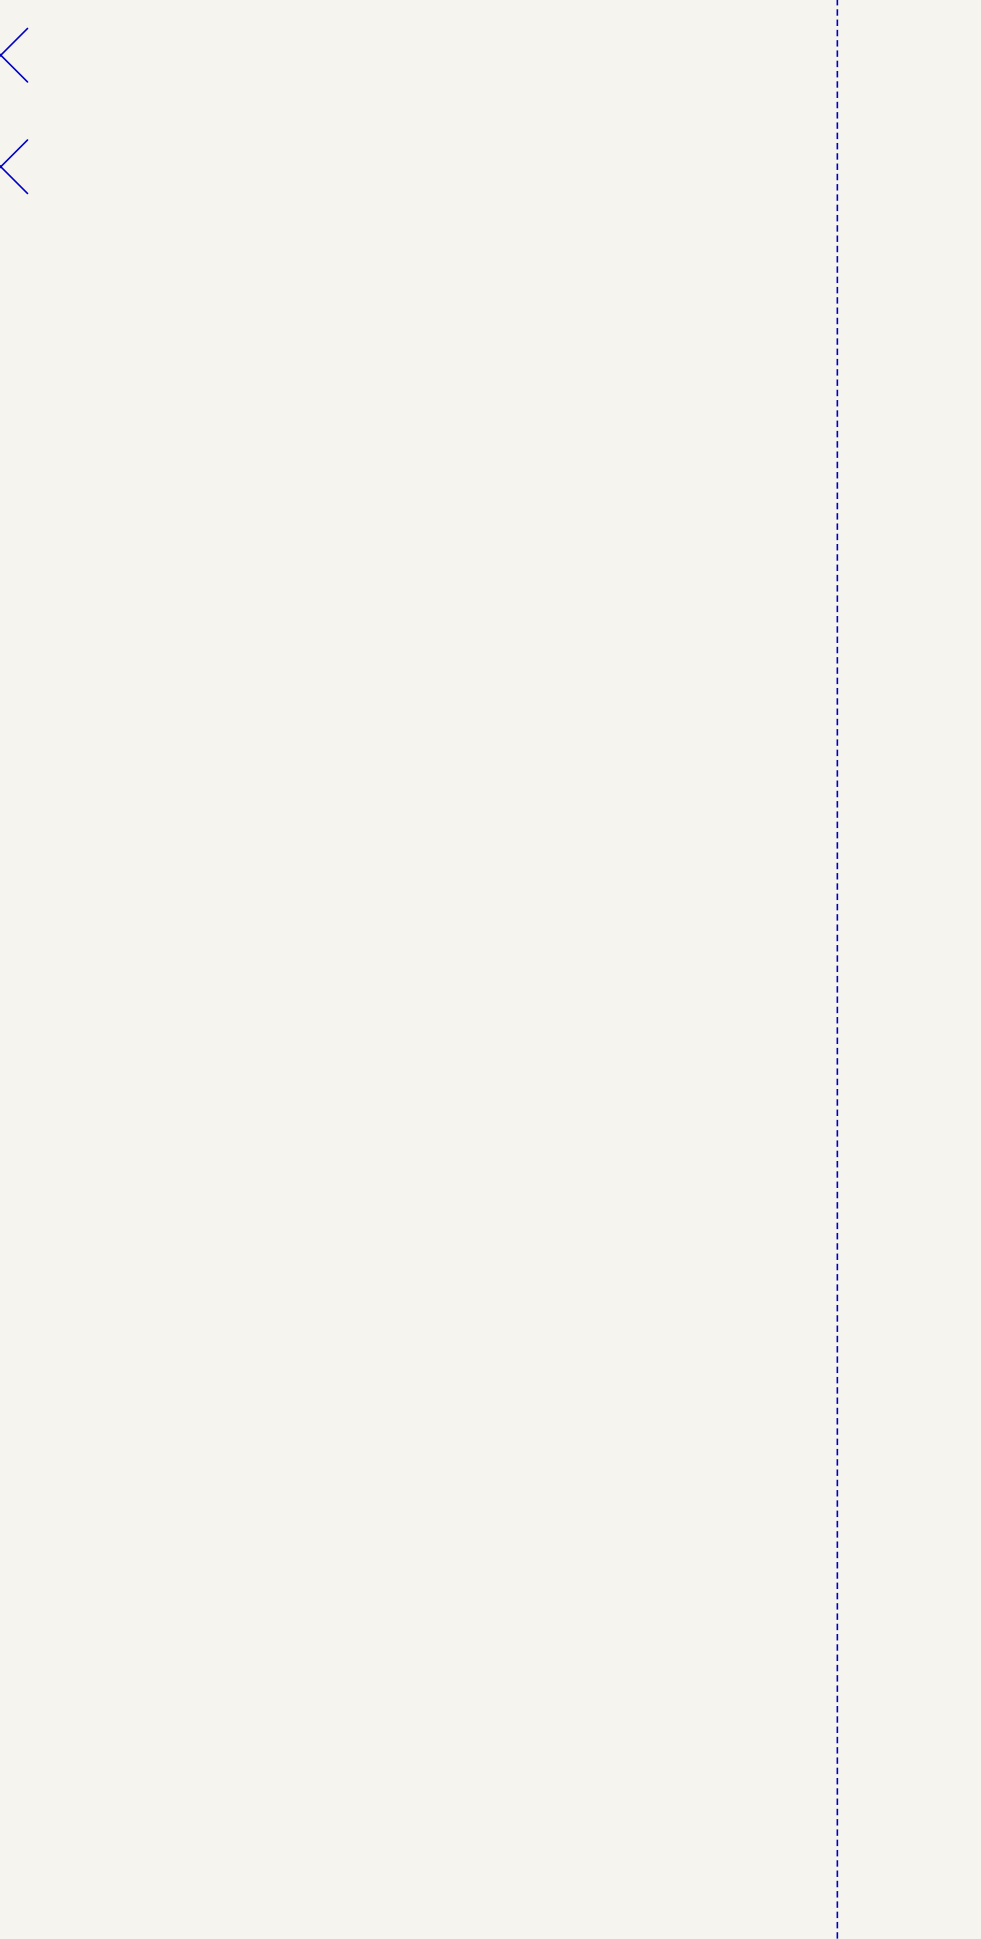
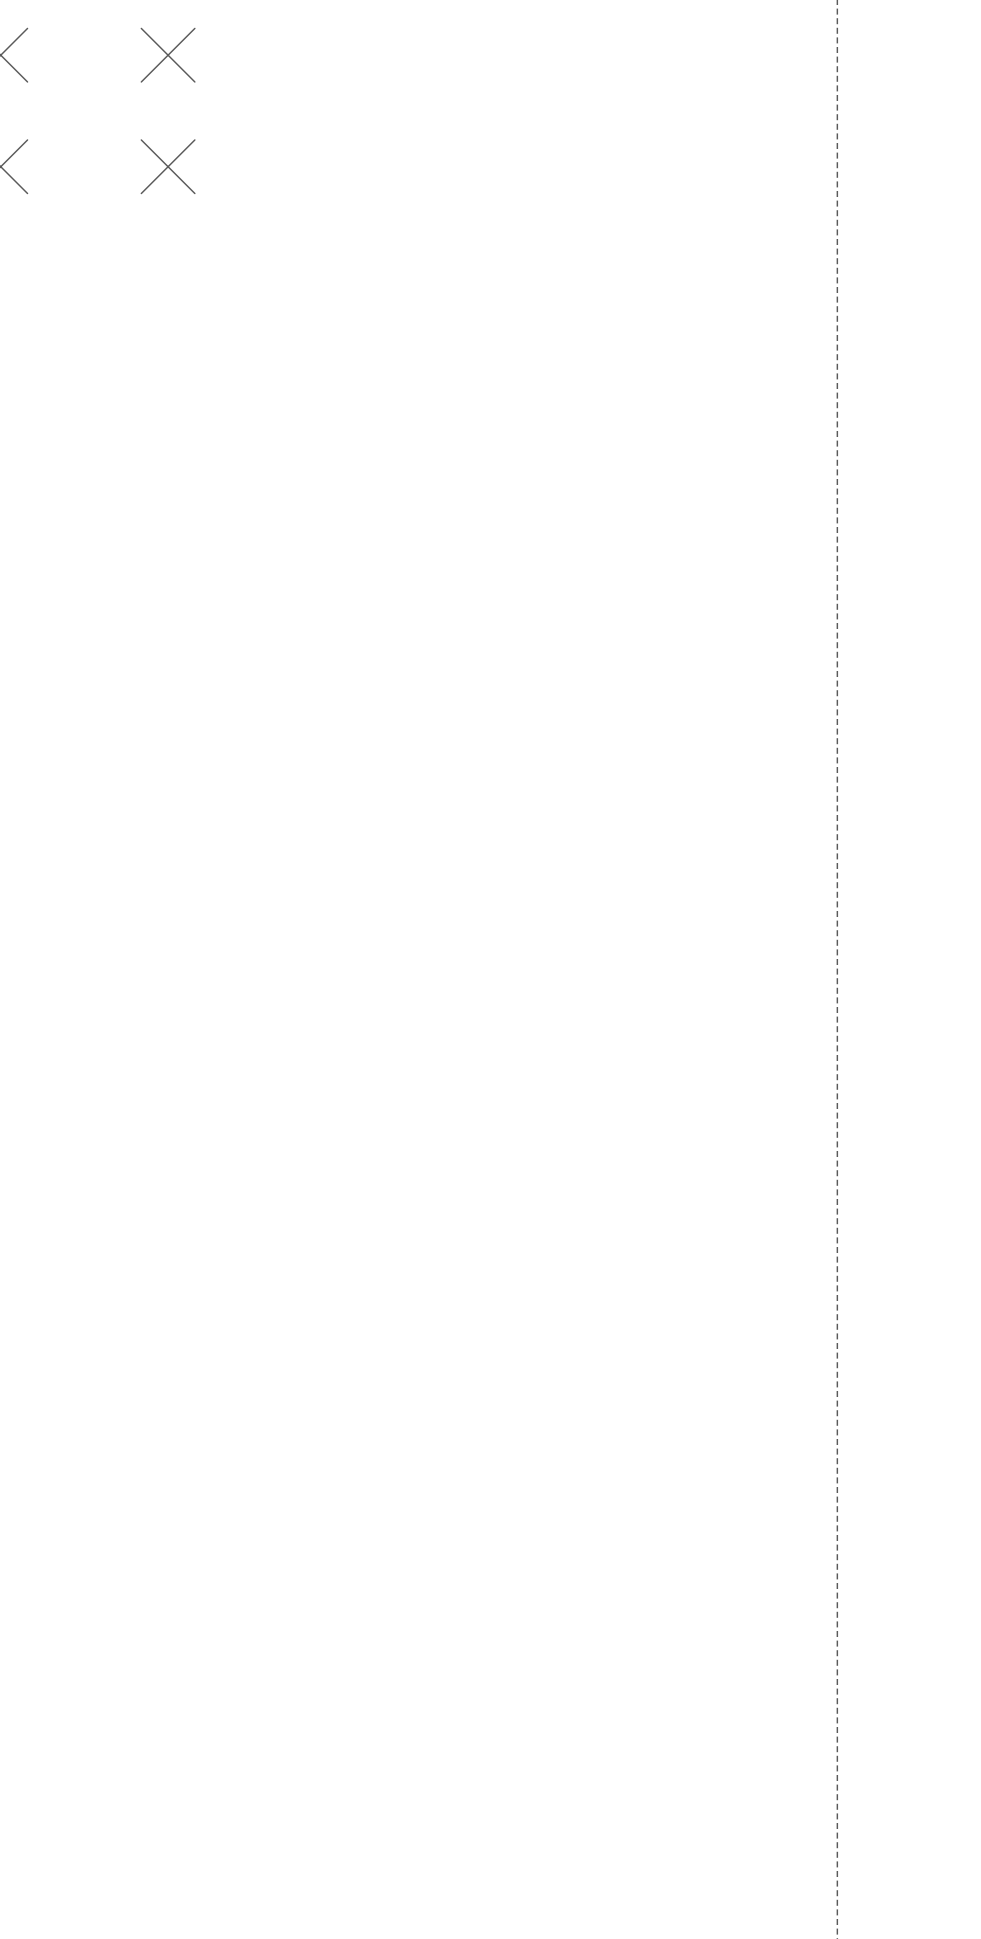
no-connect mark: none -> (168, 55)
no-connect mark: none -> (168, 166)

